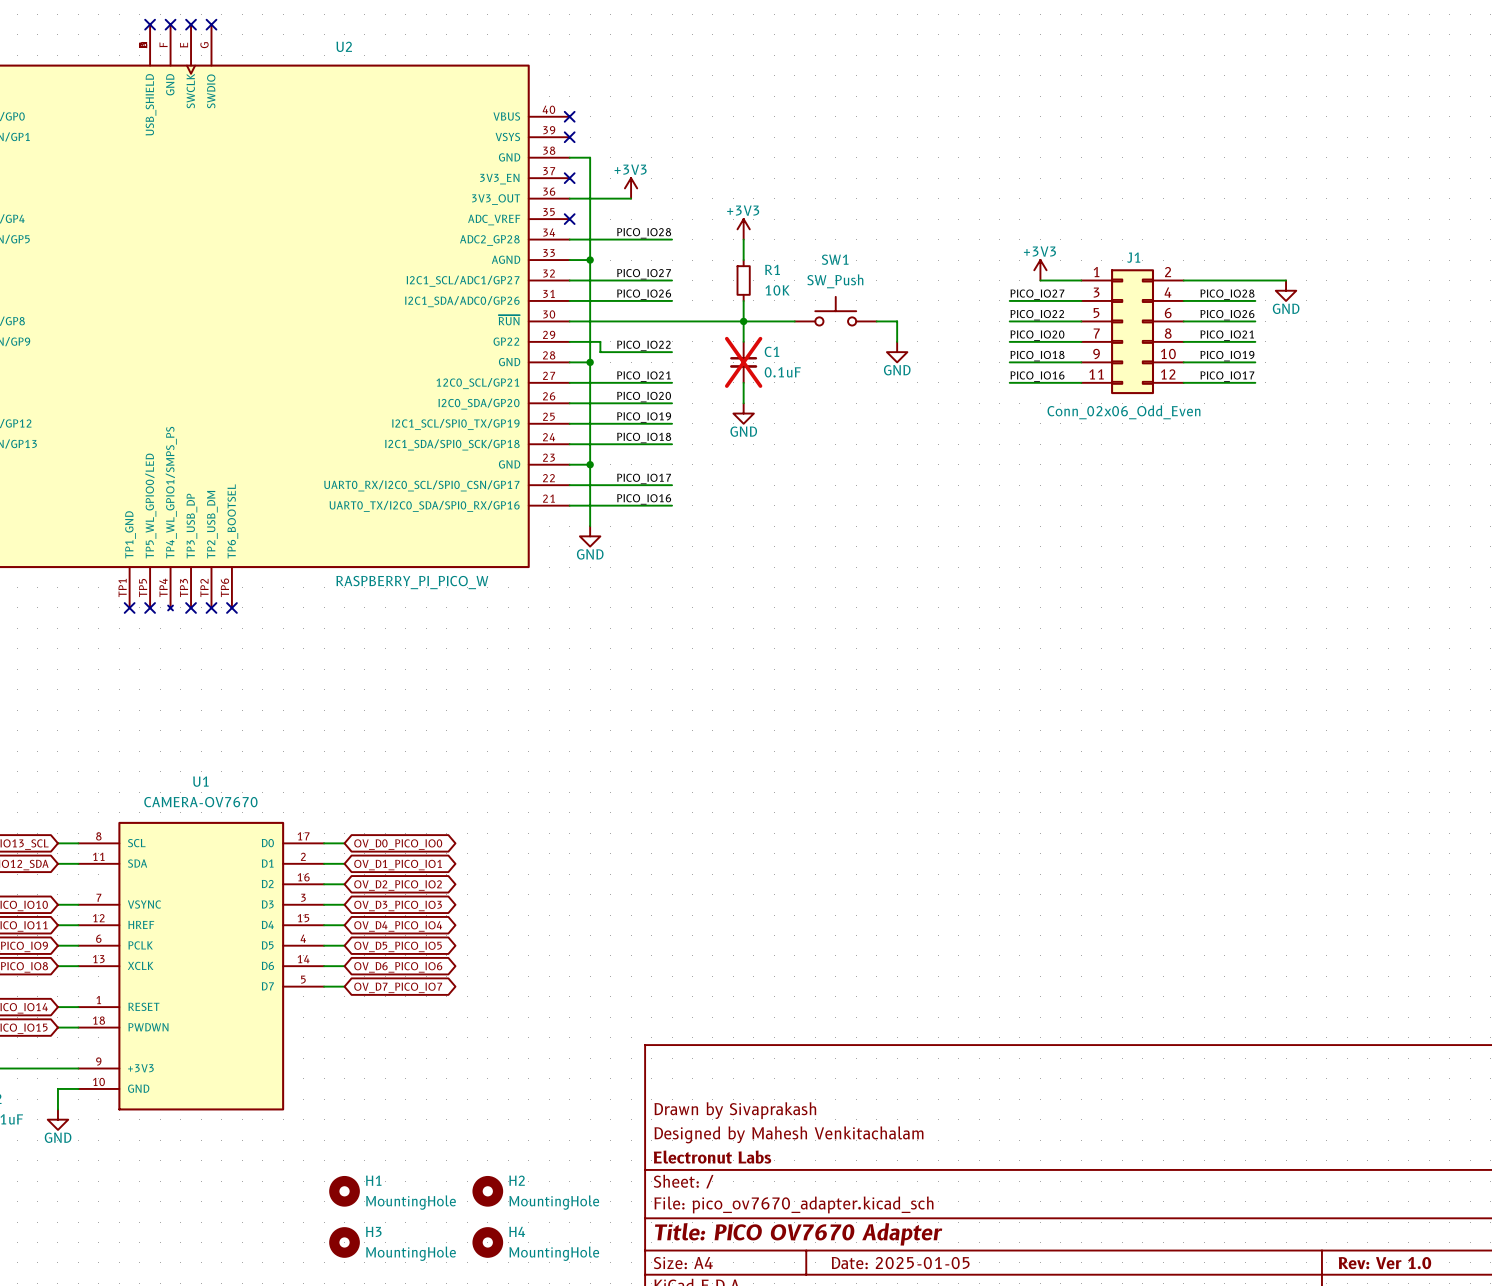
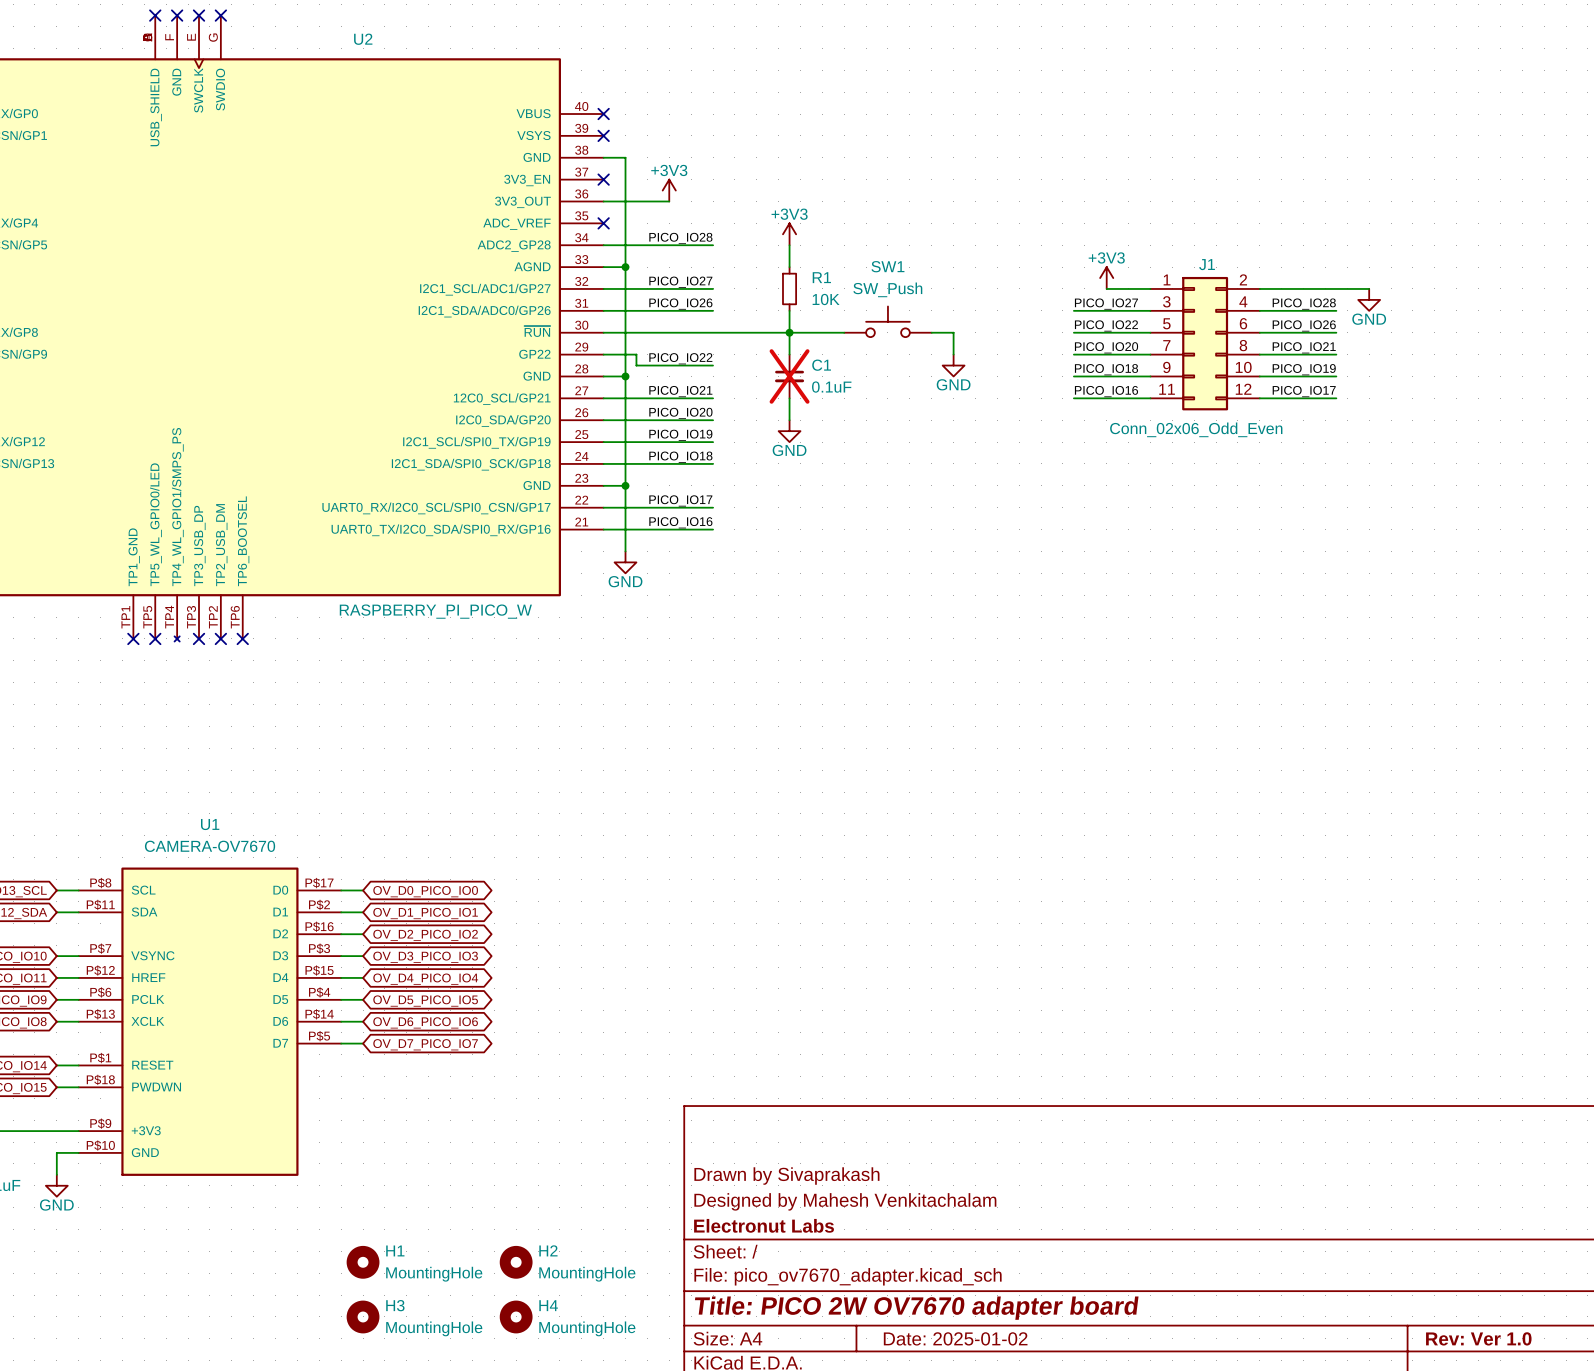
U1 symbol: [78, 821, 325, 1111] -> [78, 867, 342, 1176]
title block: Title: PICO OV7670 Adapter (798, 1234) -> Title: PICO 2W OV7670 adapter board (916, 1308)
title block: Date: 2025-01-05 (900, 1263) -> Date: 2025-01-02 (955, 1338)

